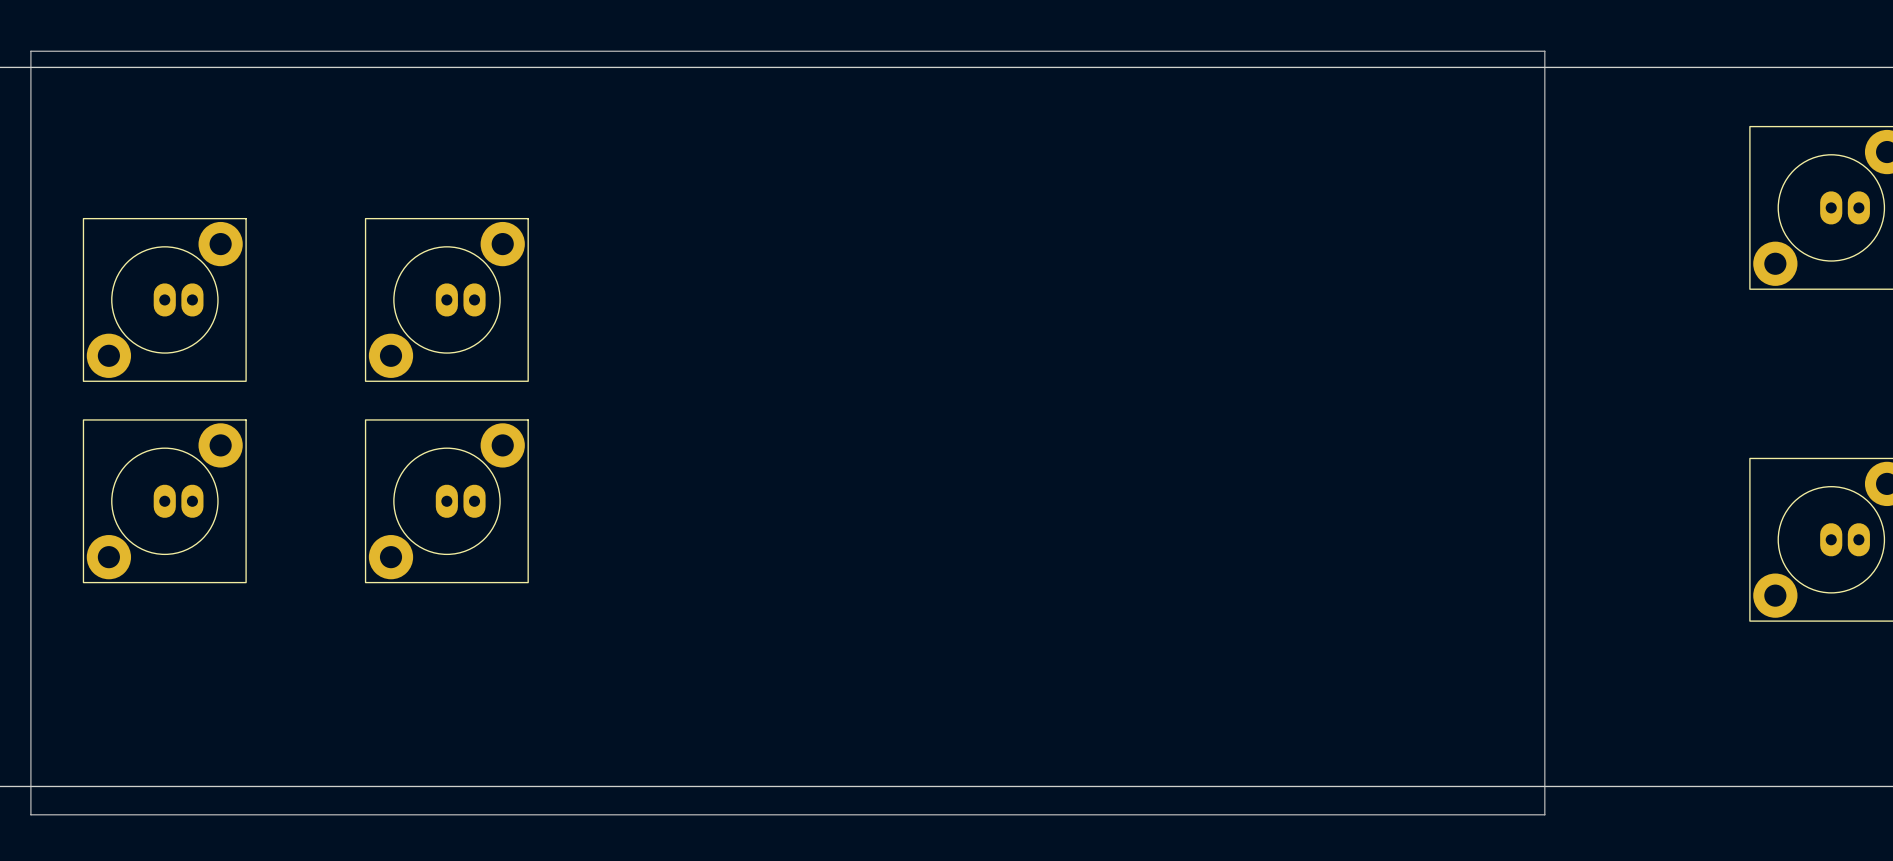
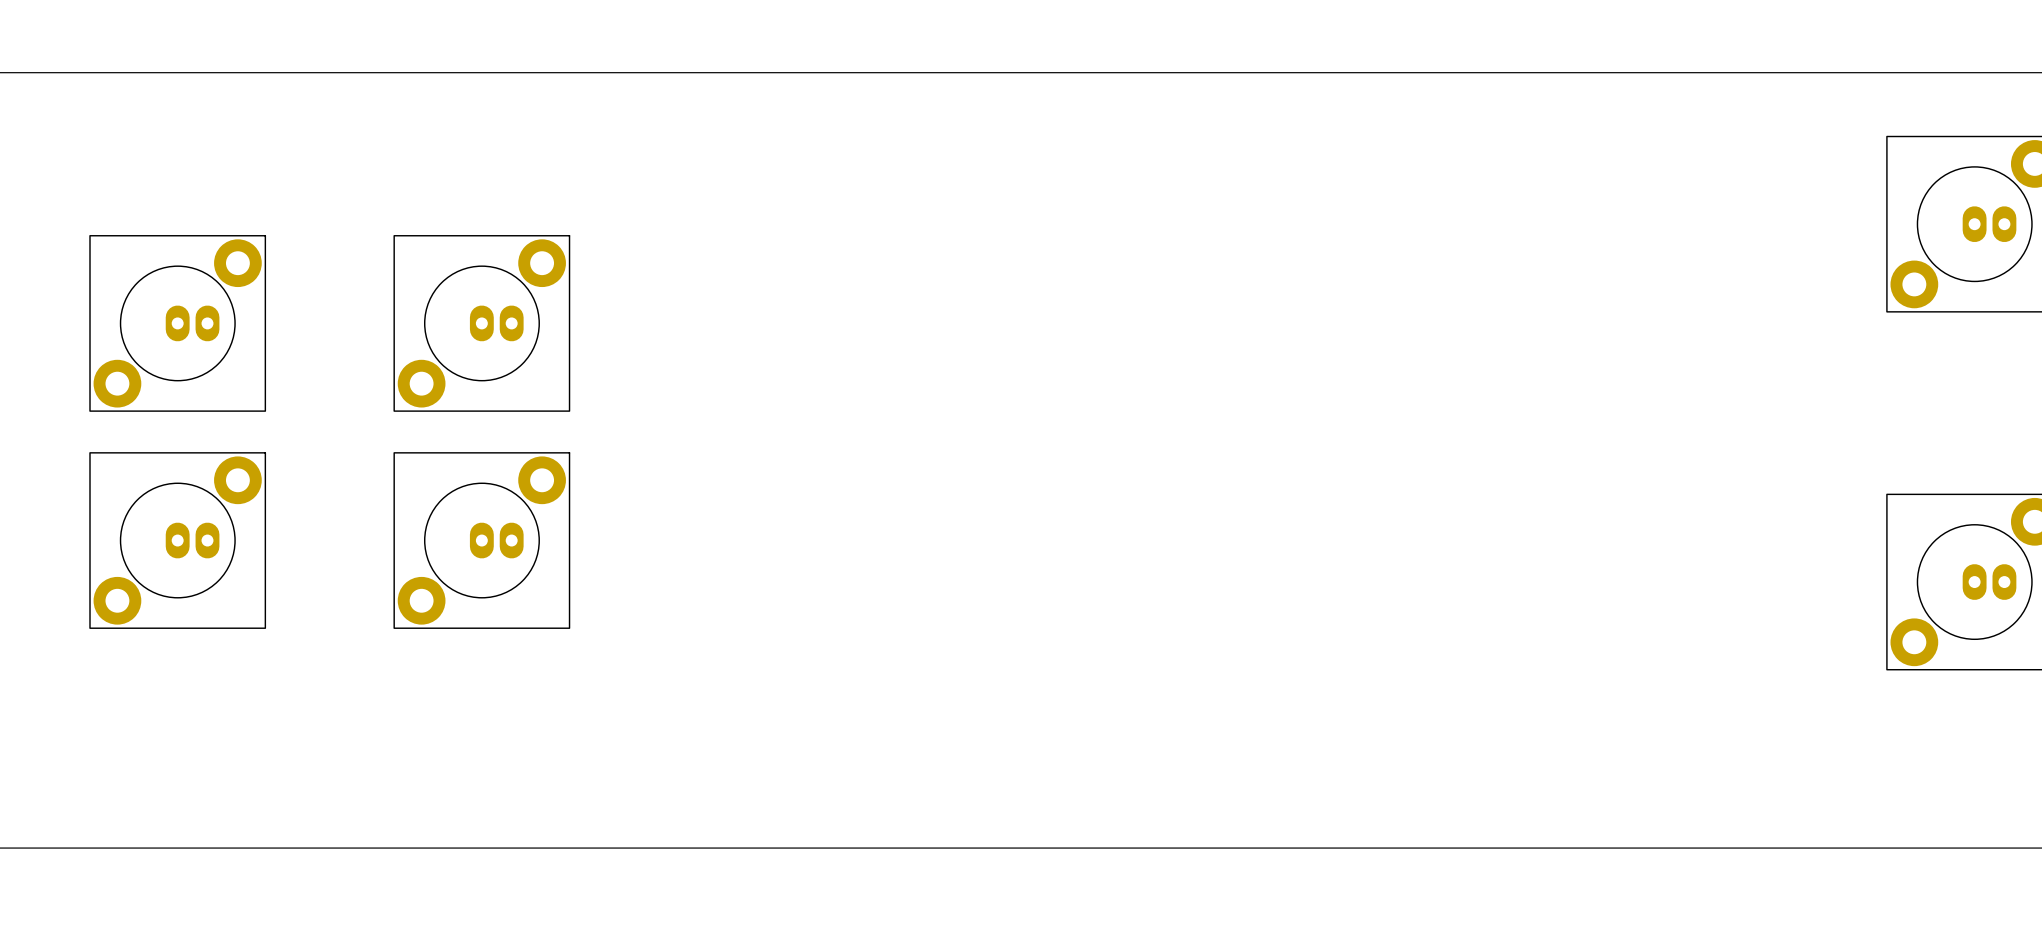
line: (30, 51) (1544, 51) (1544, 814) (30, 814) (30, 51) -> none

